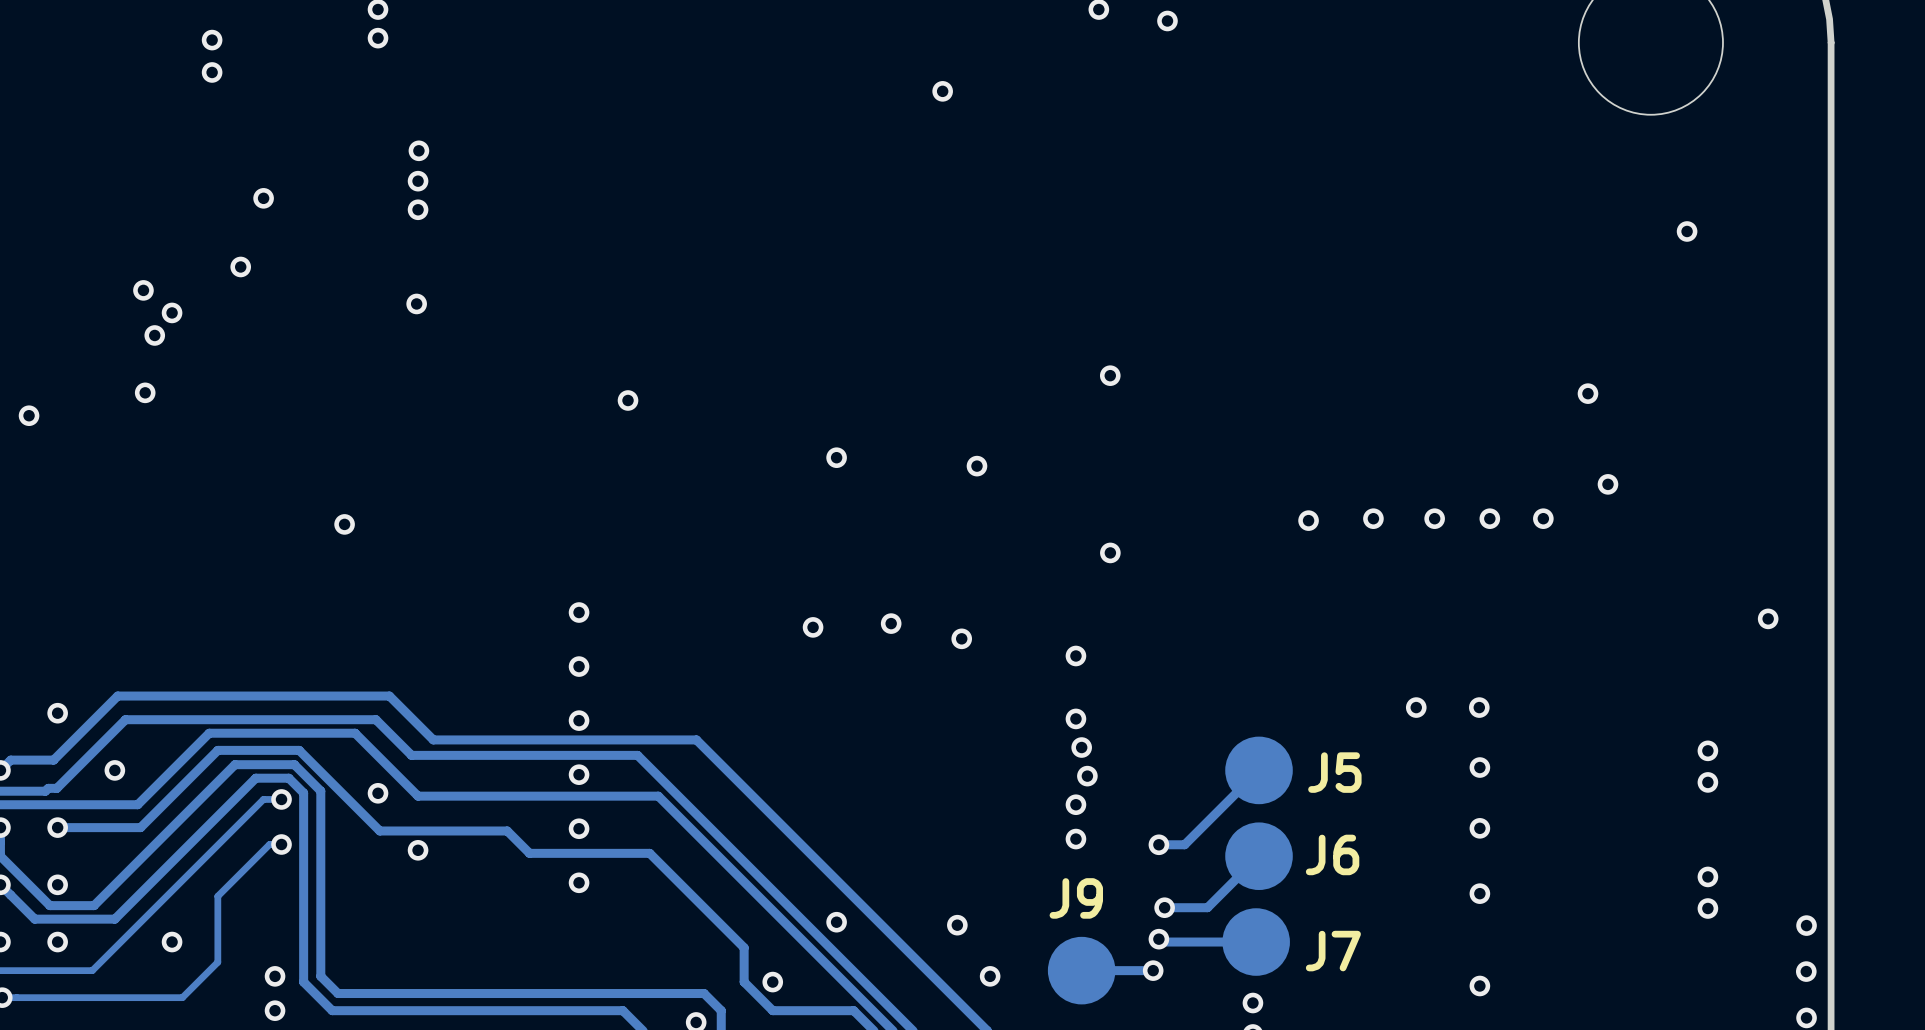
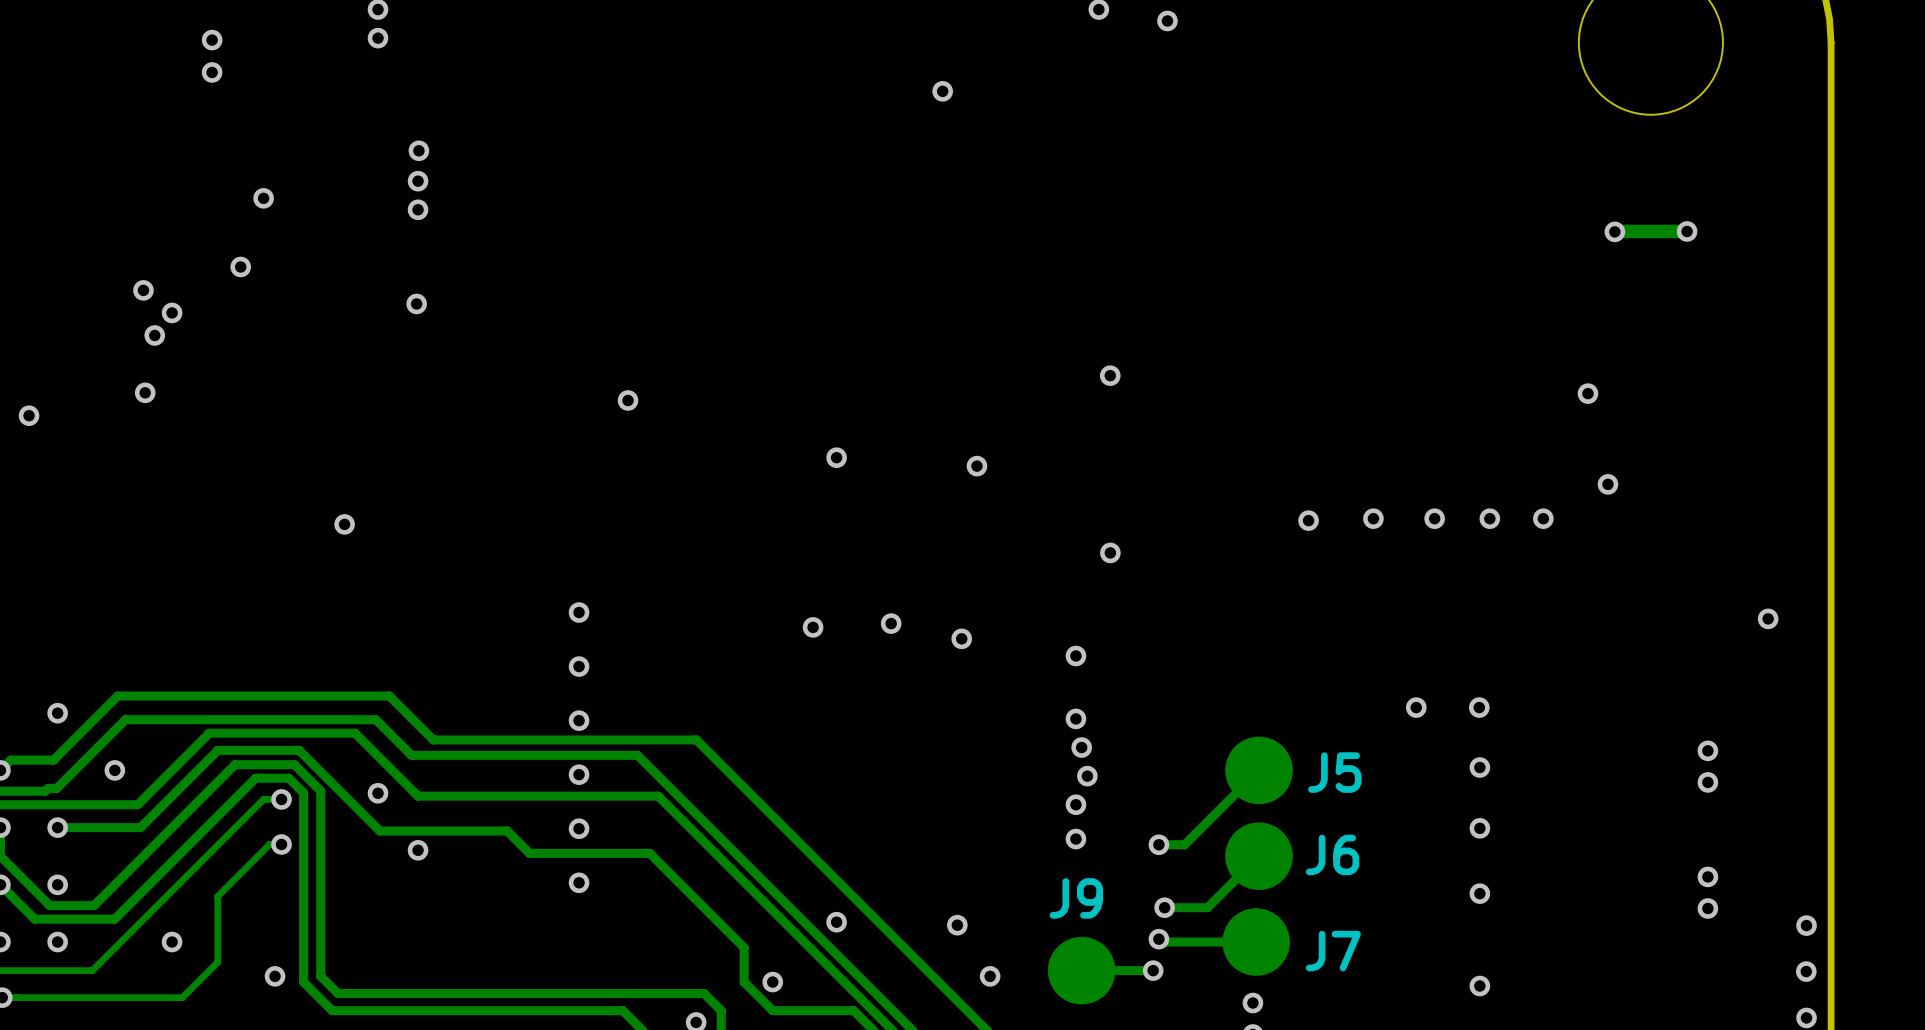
via: none -> (1614, 231)
track: none -> (1687, 231) (1615, 231)
via: (275, 1010) -> none

